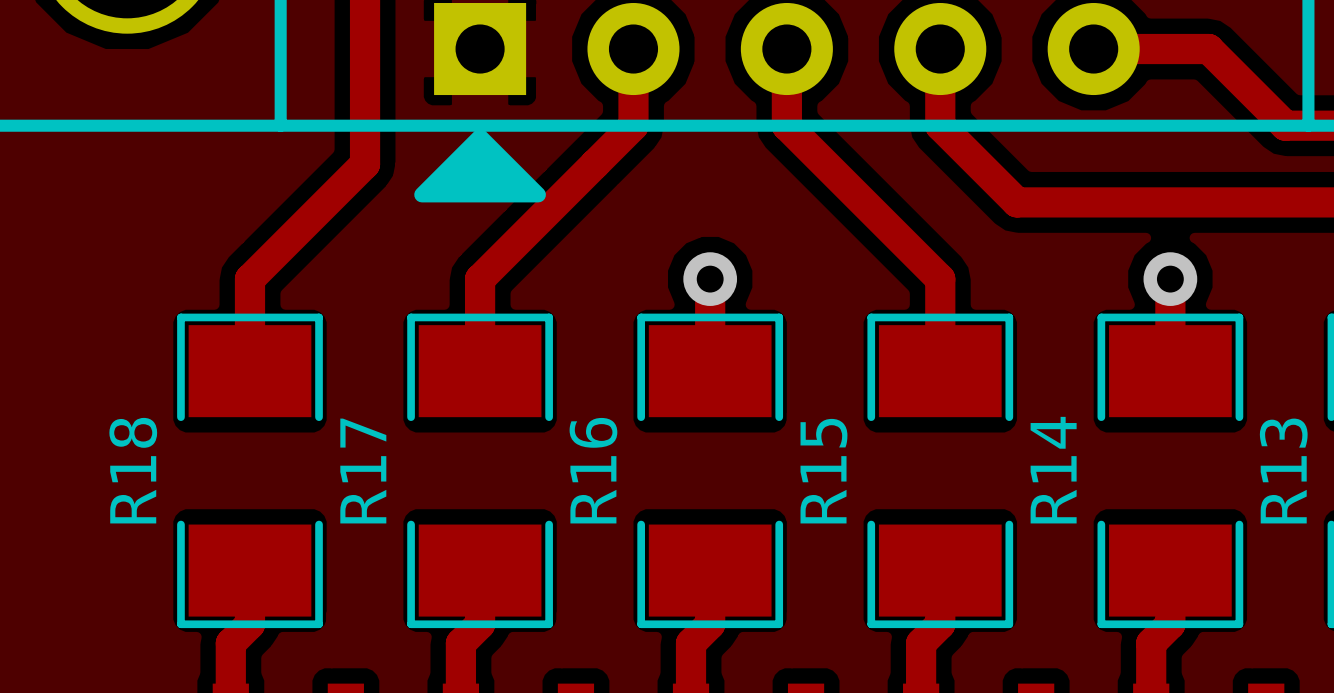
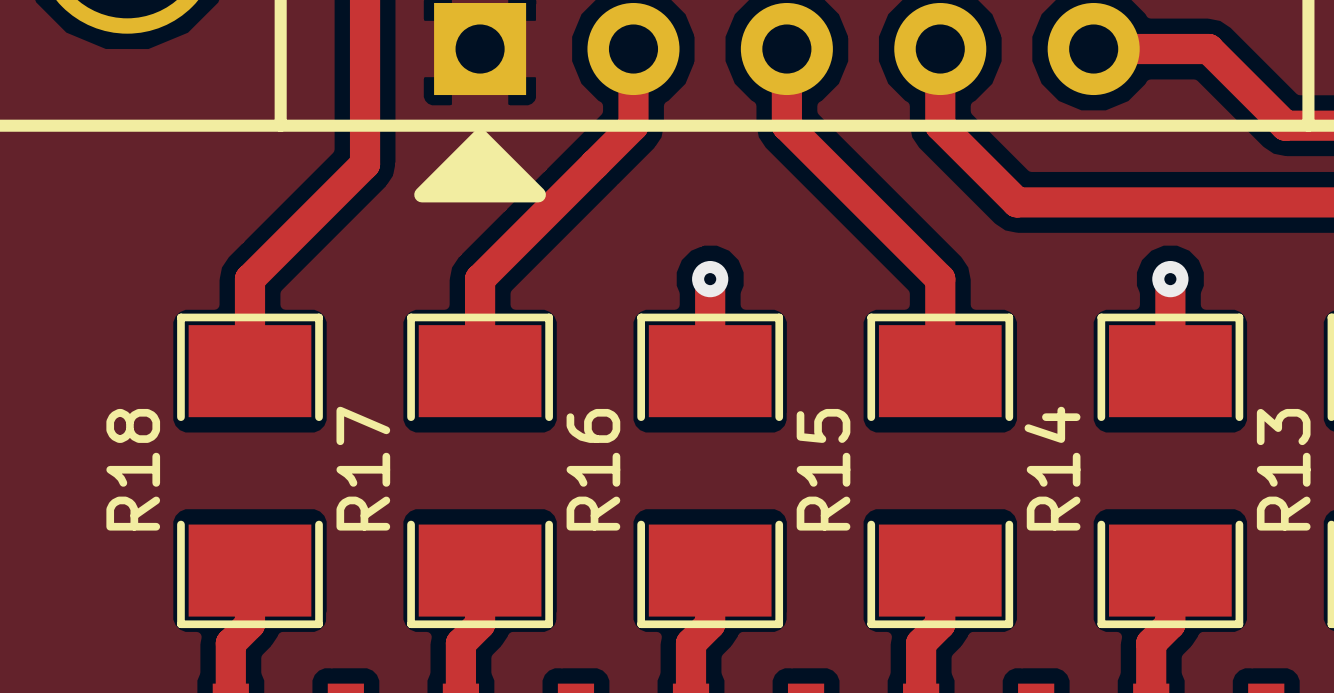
via size: [683, 252, 738, 306] -> [692, 260, 729, 298]
via size: [1143, 252, 1198, 306] -> [1152, 260, 1189, 298]

